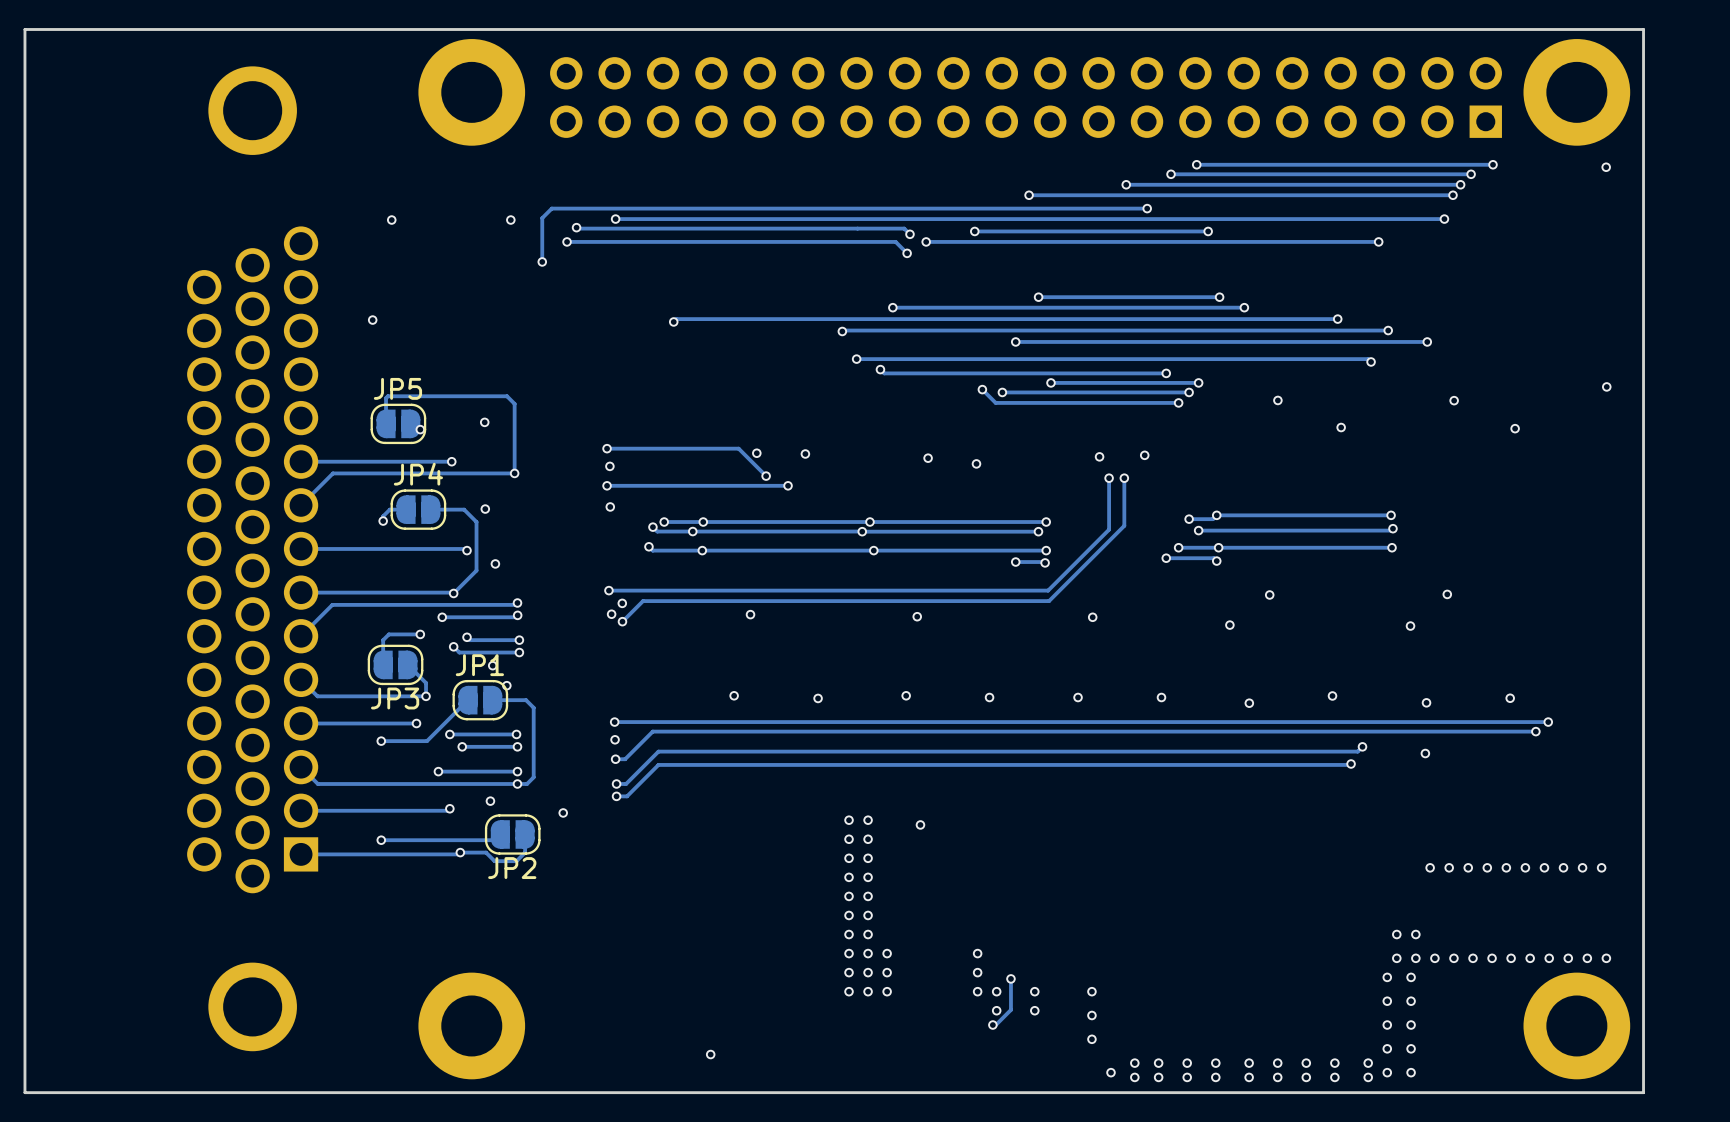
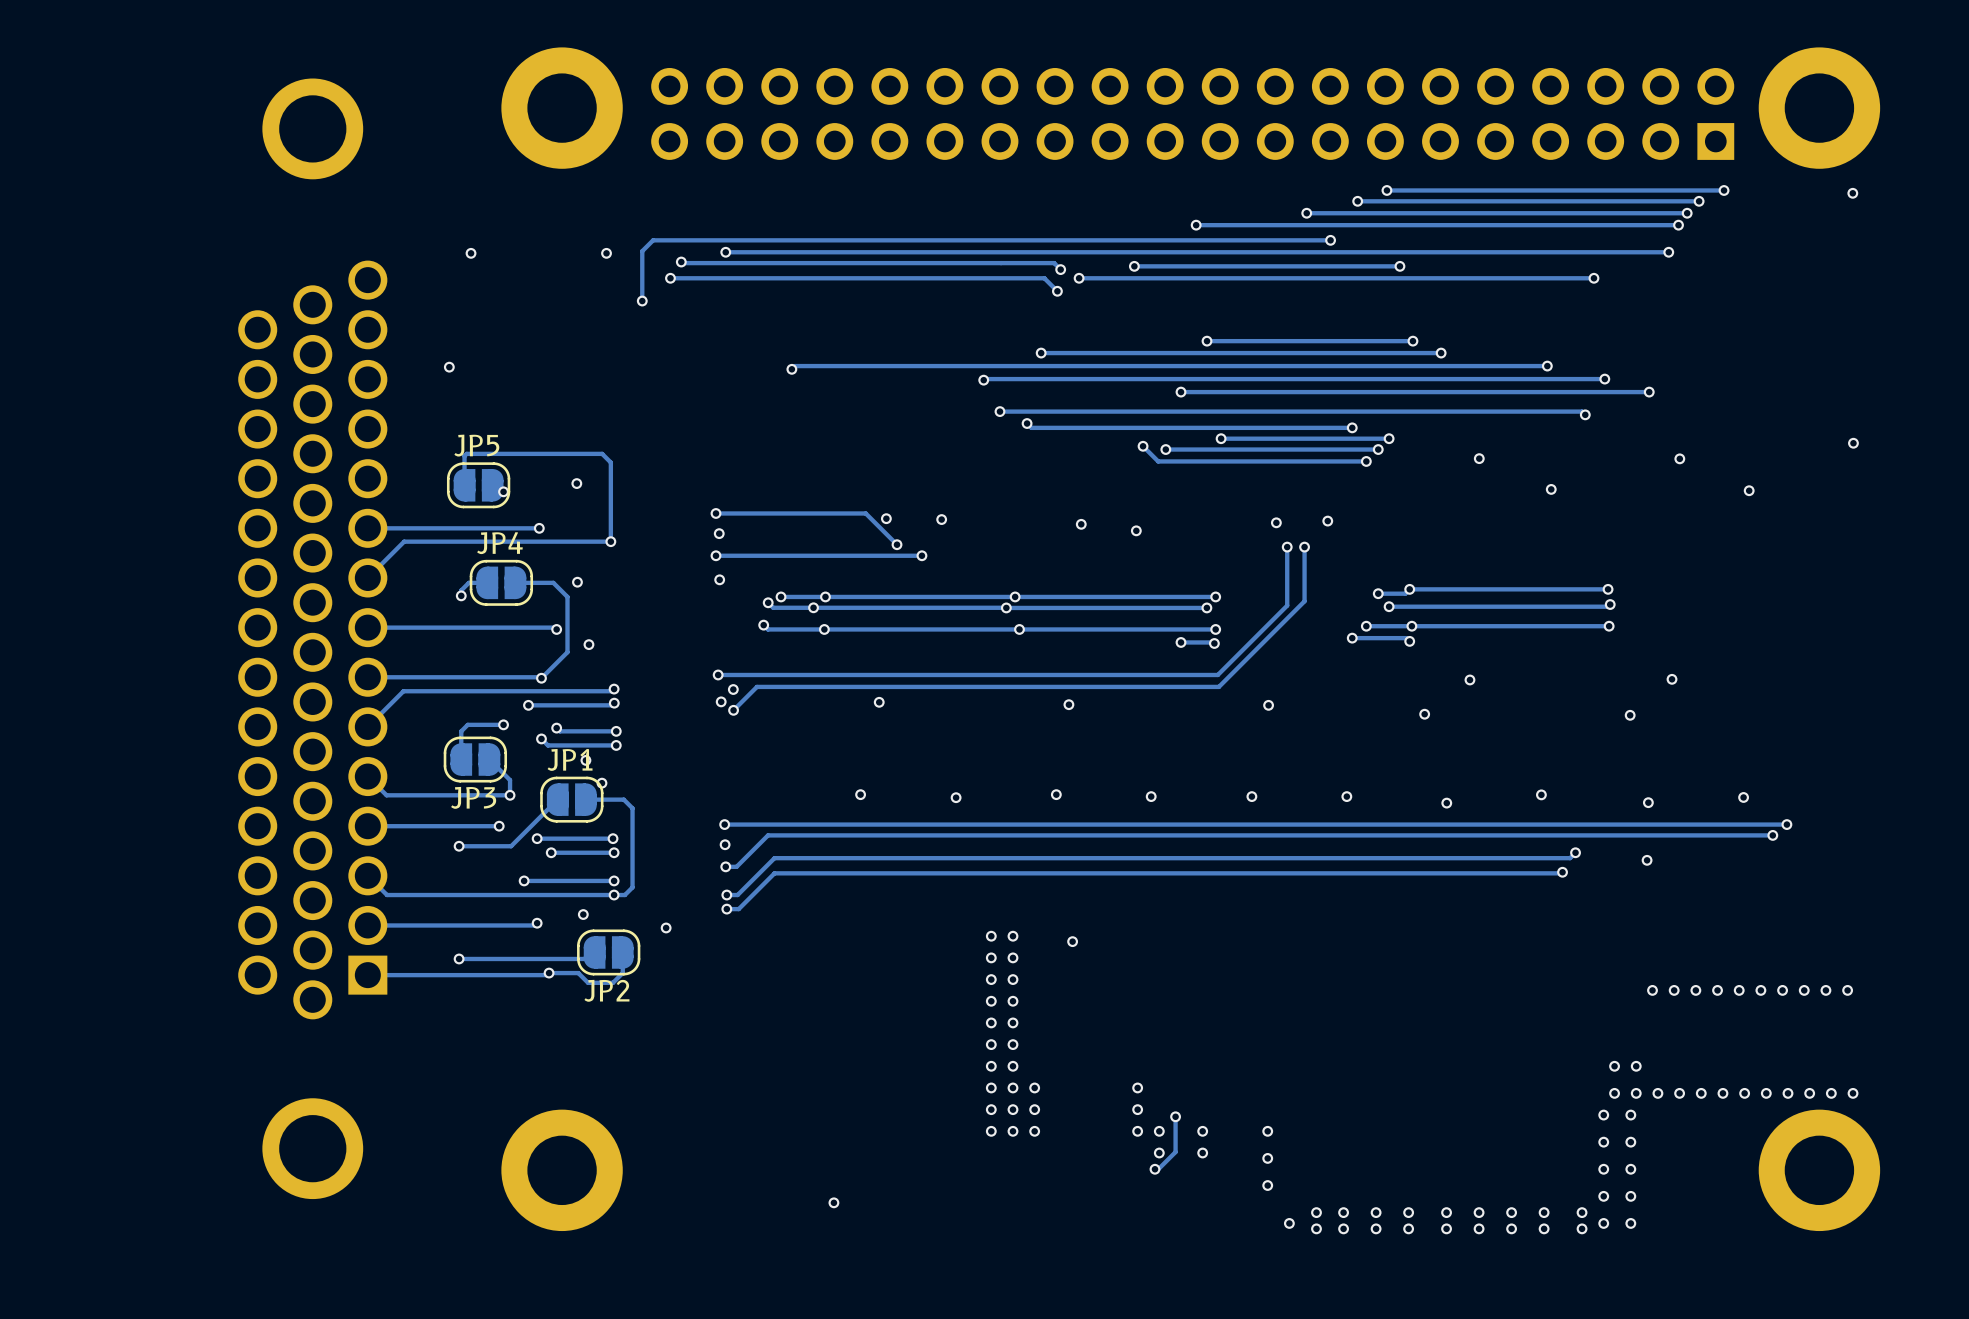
board edge: (1643, 29) (24, 29) (24, 1092) (1643, 1092) (1643, 29) -> none

